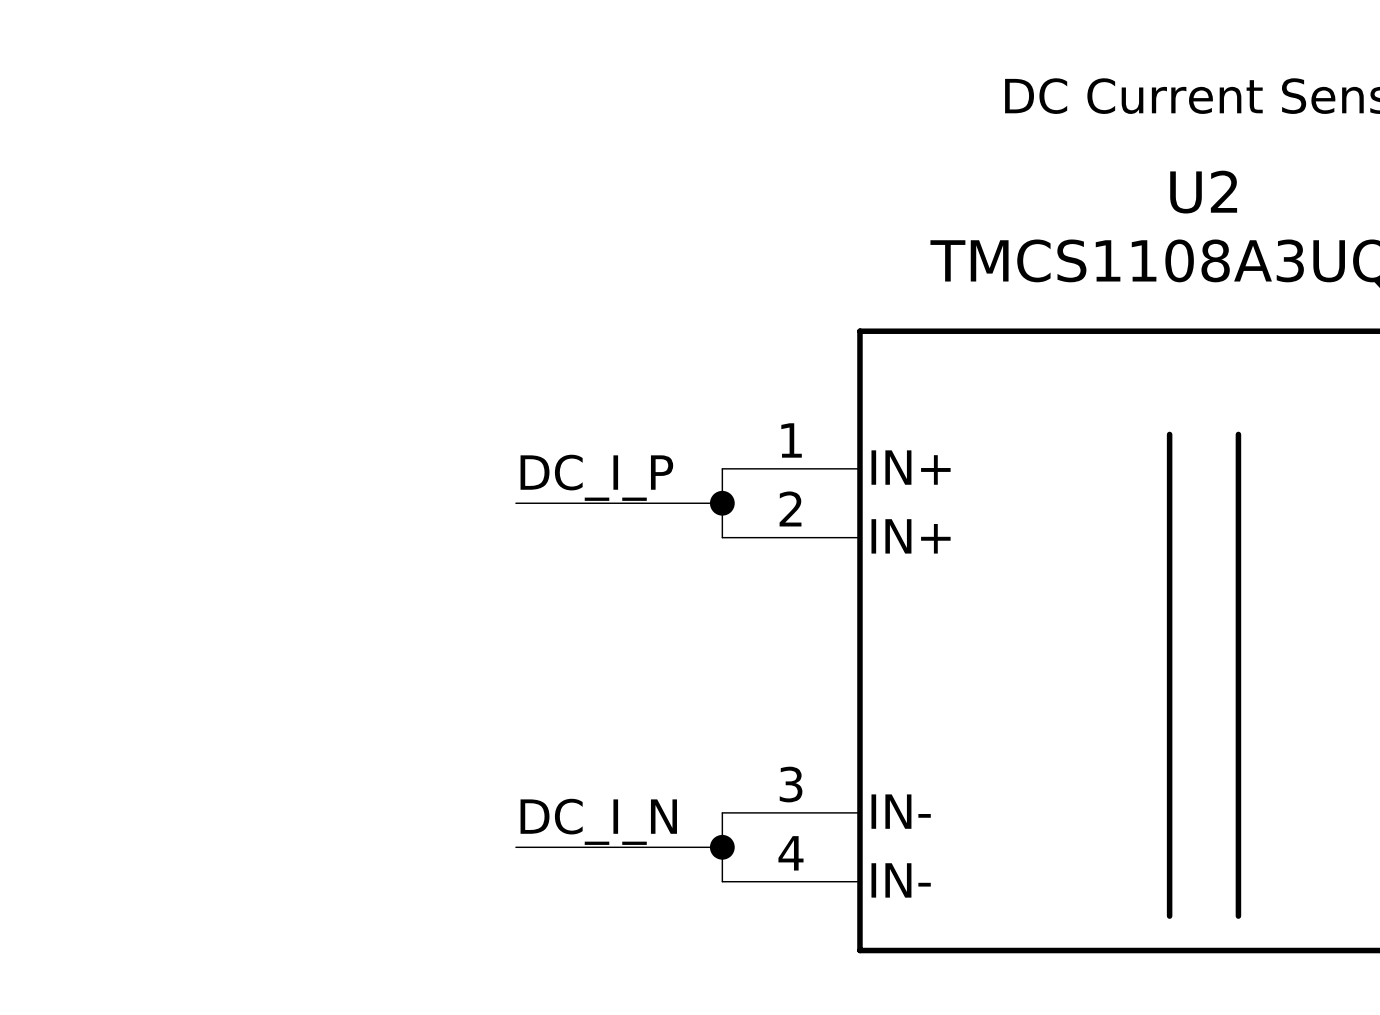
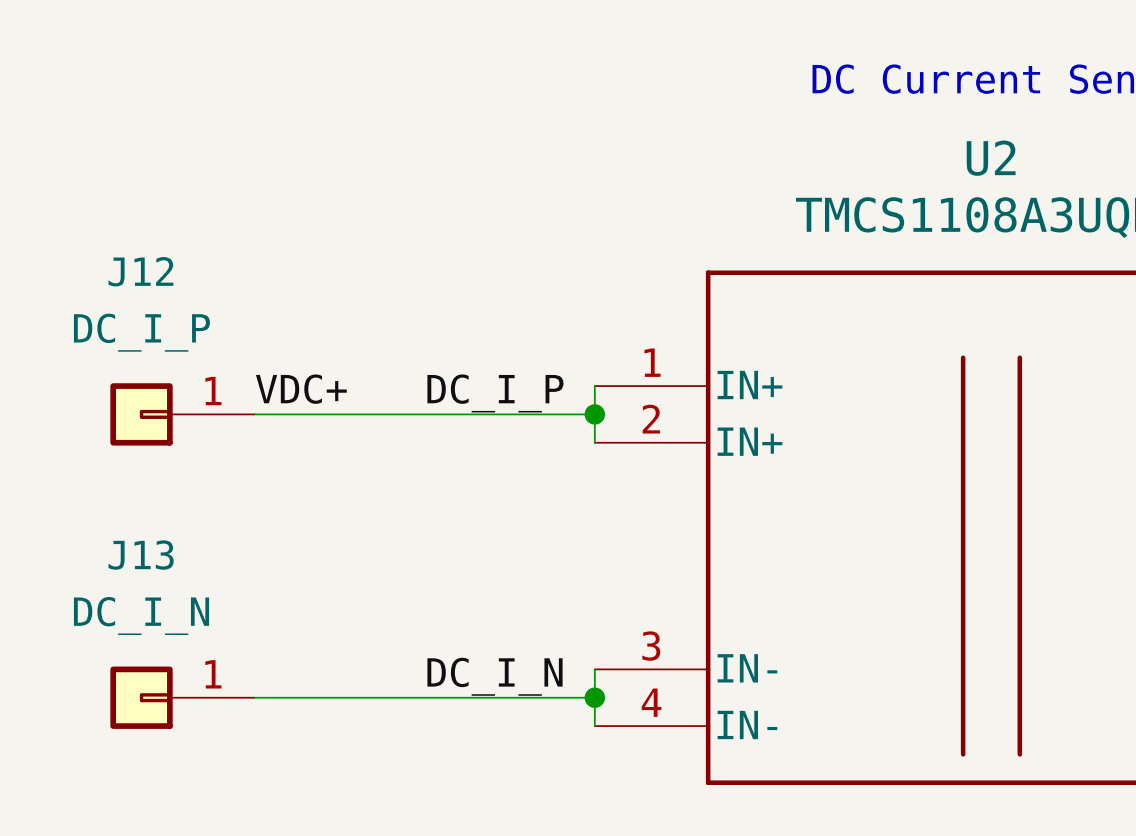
label: none -> VDC+ (301, 389)
J12: none -> DC_I_P (182, 414)
wire: none -> (254, 414) (424, 414)
J13: none -> DC_I_N (182, 697)
wire: none -> (254, 697) (424, 697)

